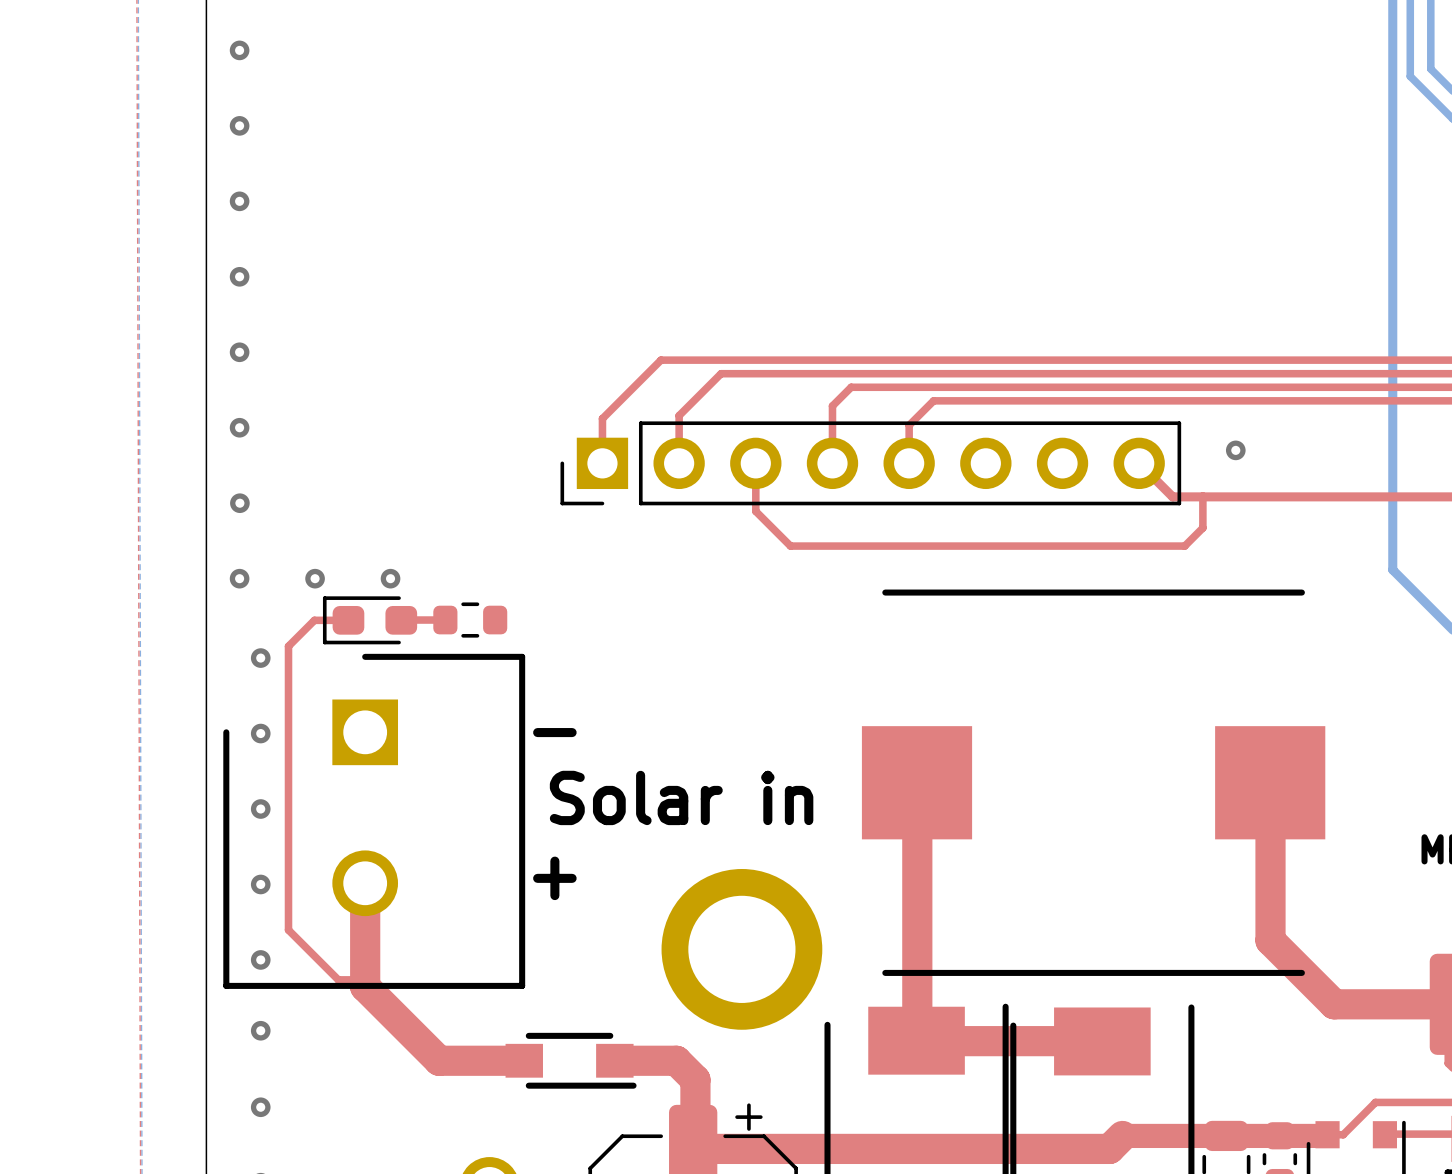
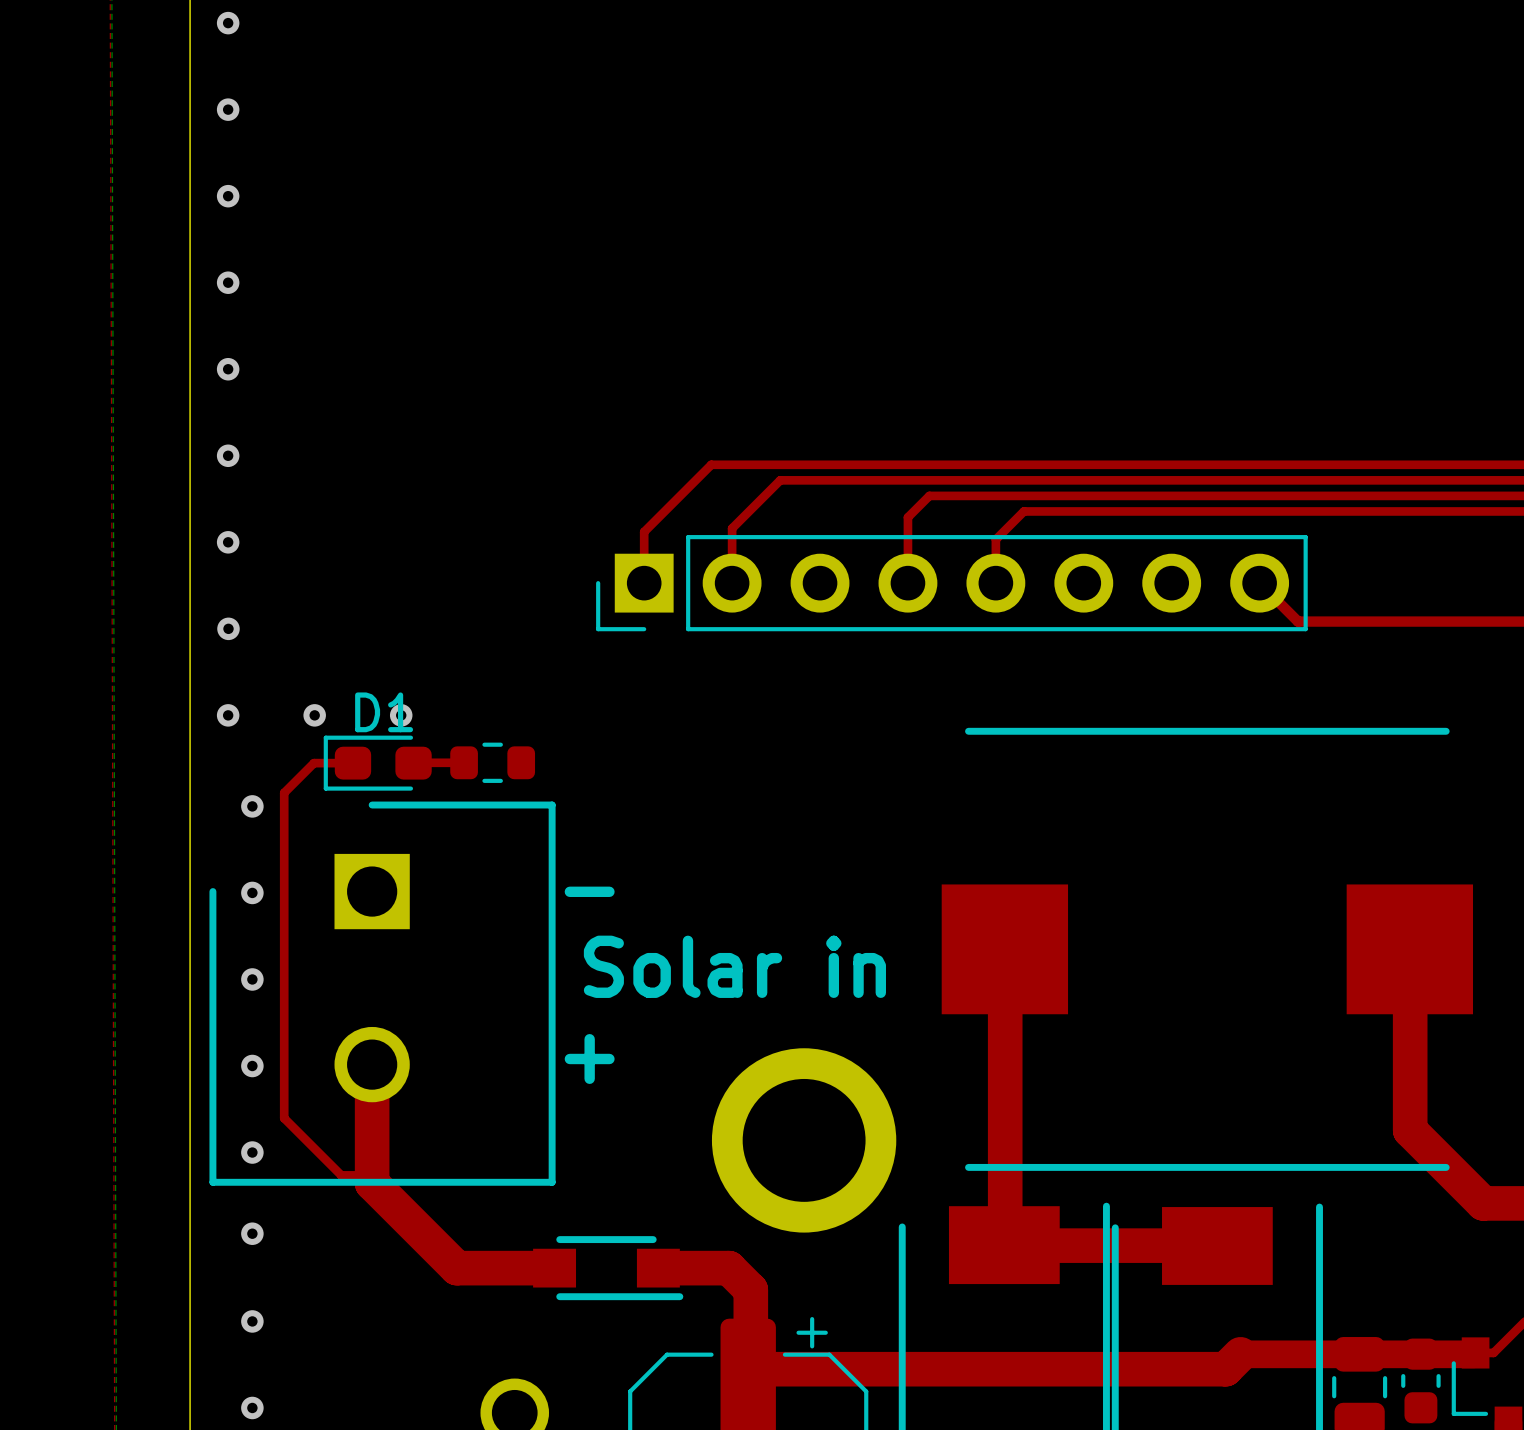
via: (1235, 450) -> none
top track: (755, 463) (755, 511) (790, 546) (1184, 546) (1202, 527) (1202, 496) -> none
D1 name: none -> D1 (384, 712)

